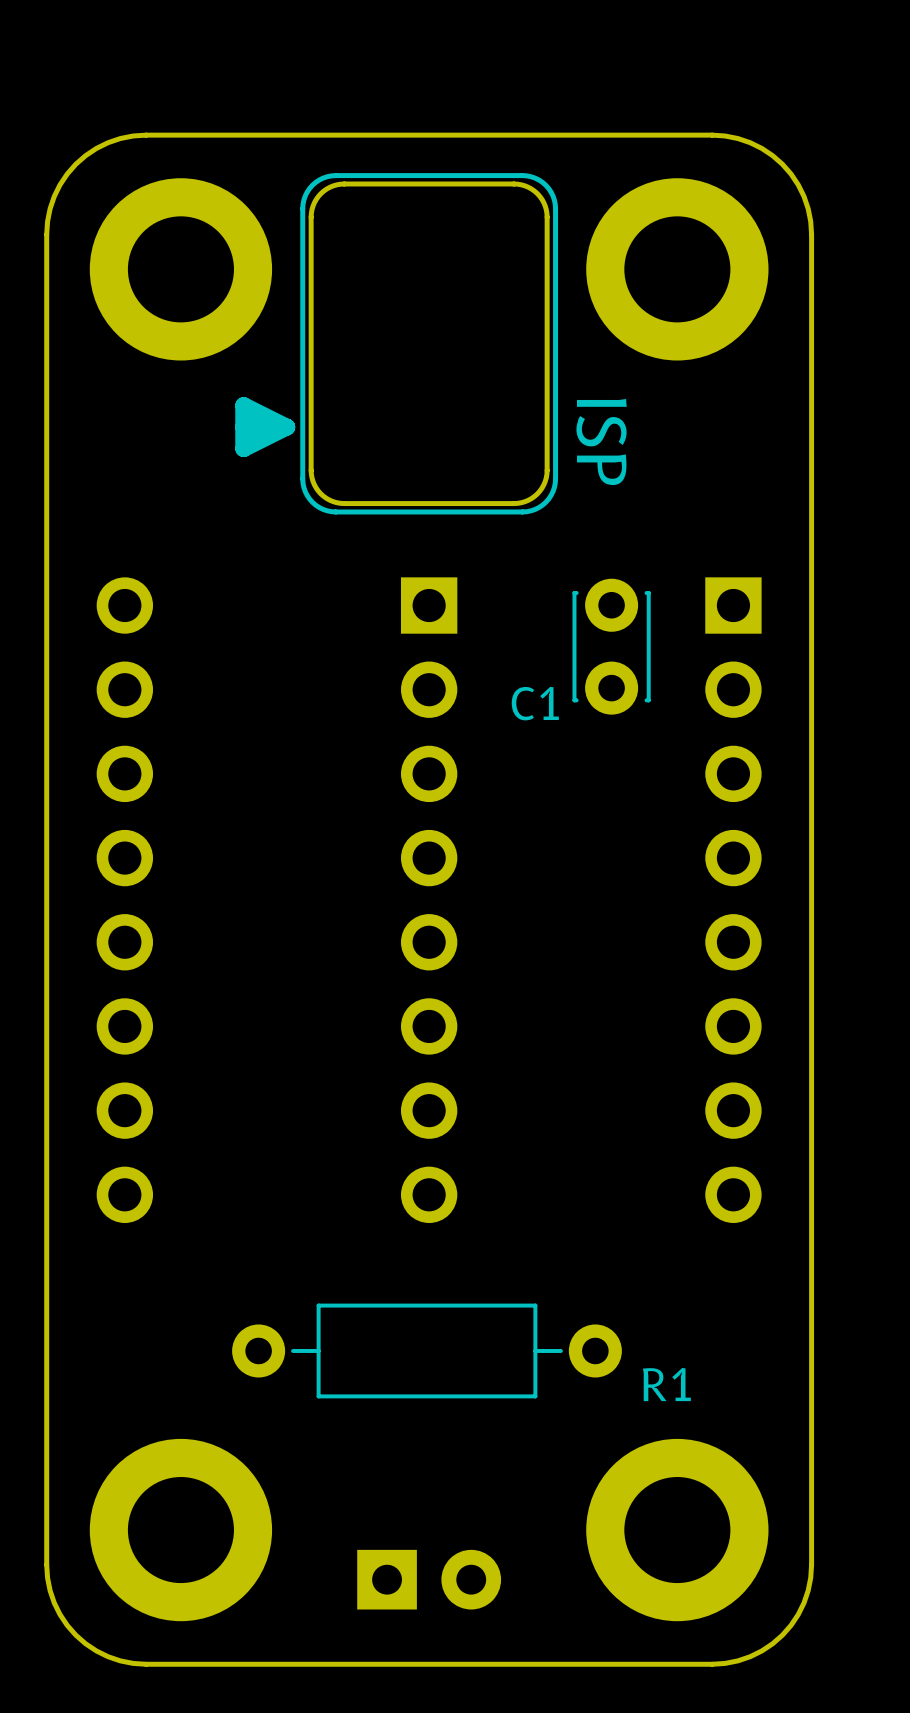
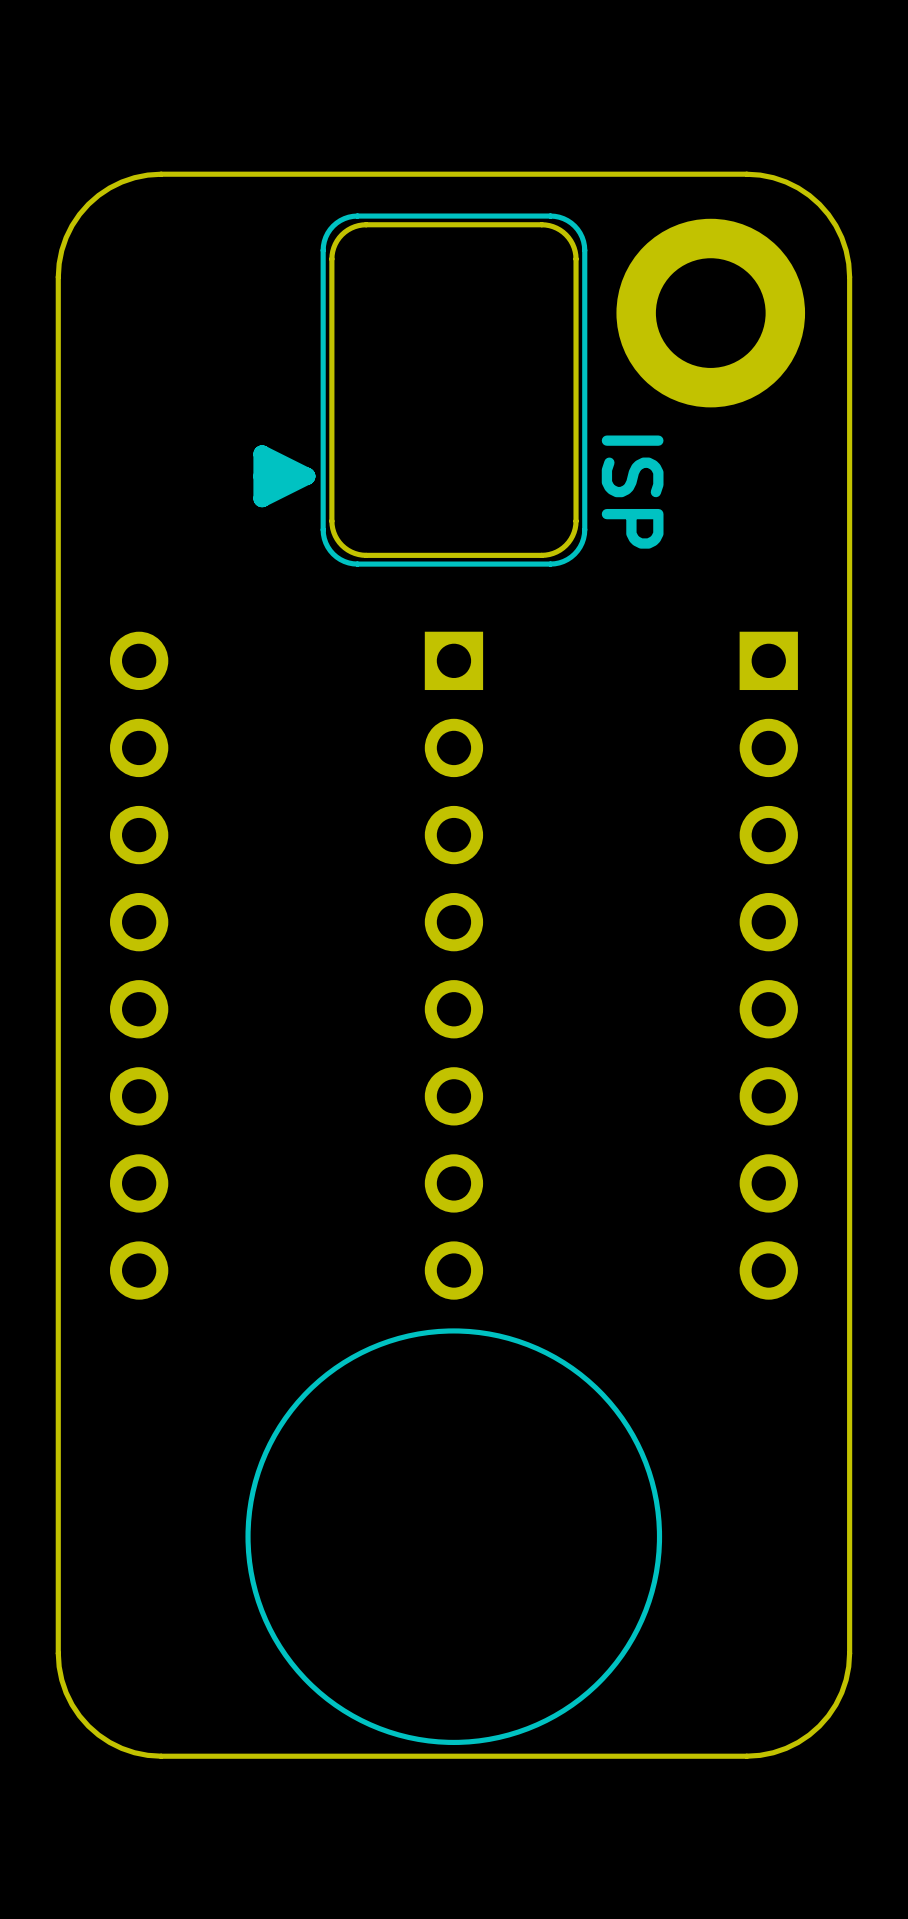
part: (180, 269) -> none
C1: (611, 646) -> none
drawing: none -> [245, 1328, 663, 1746]
R1: (426, 1350) -> none
part: (180, 1530) -> none
part: (677, 1530) -> none
part: (429, 1579) -> none

